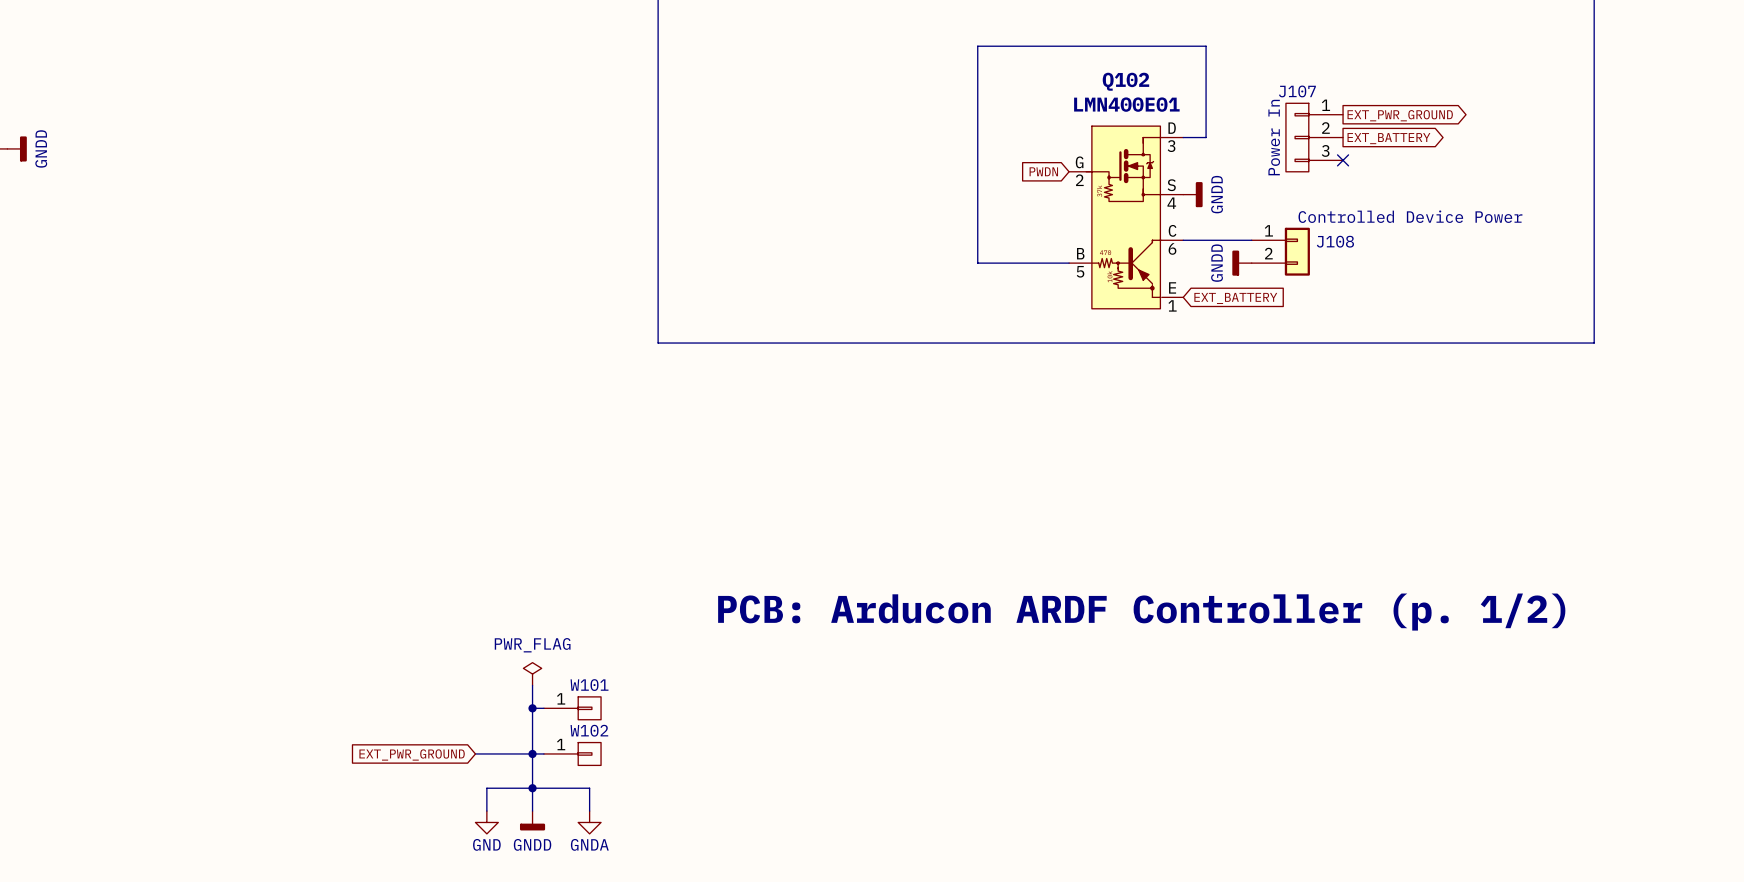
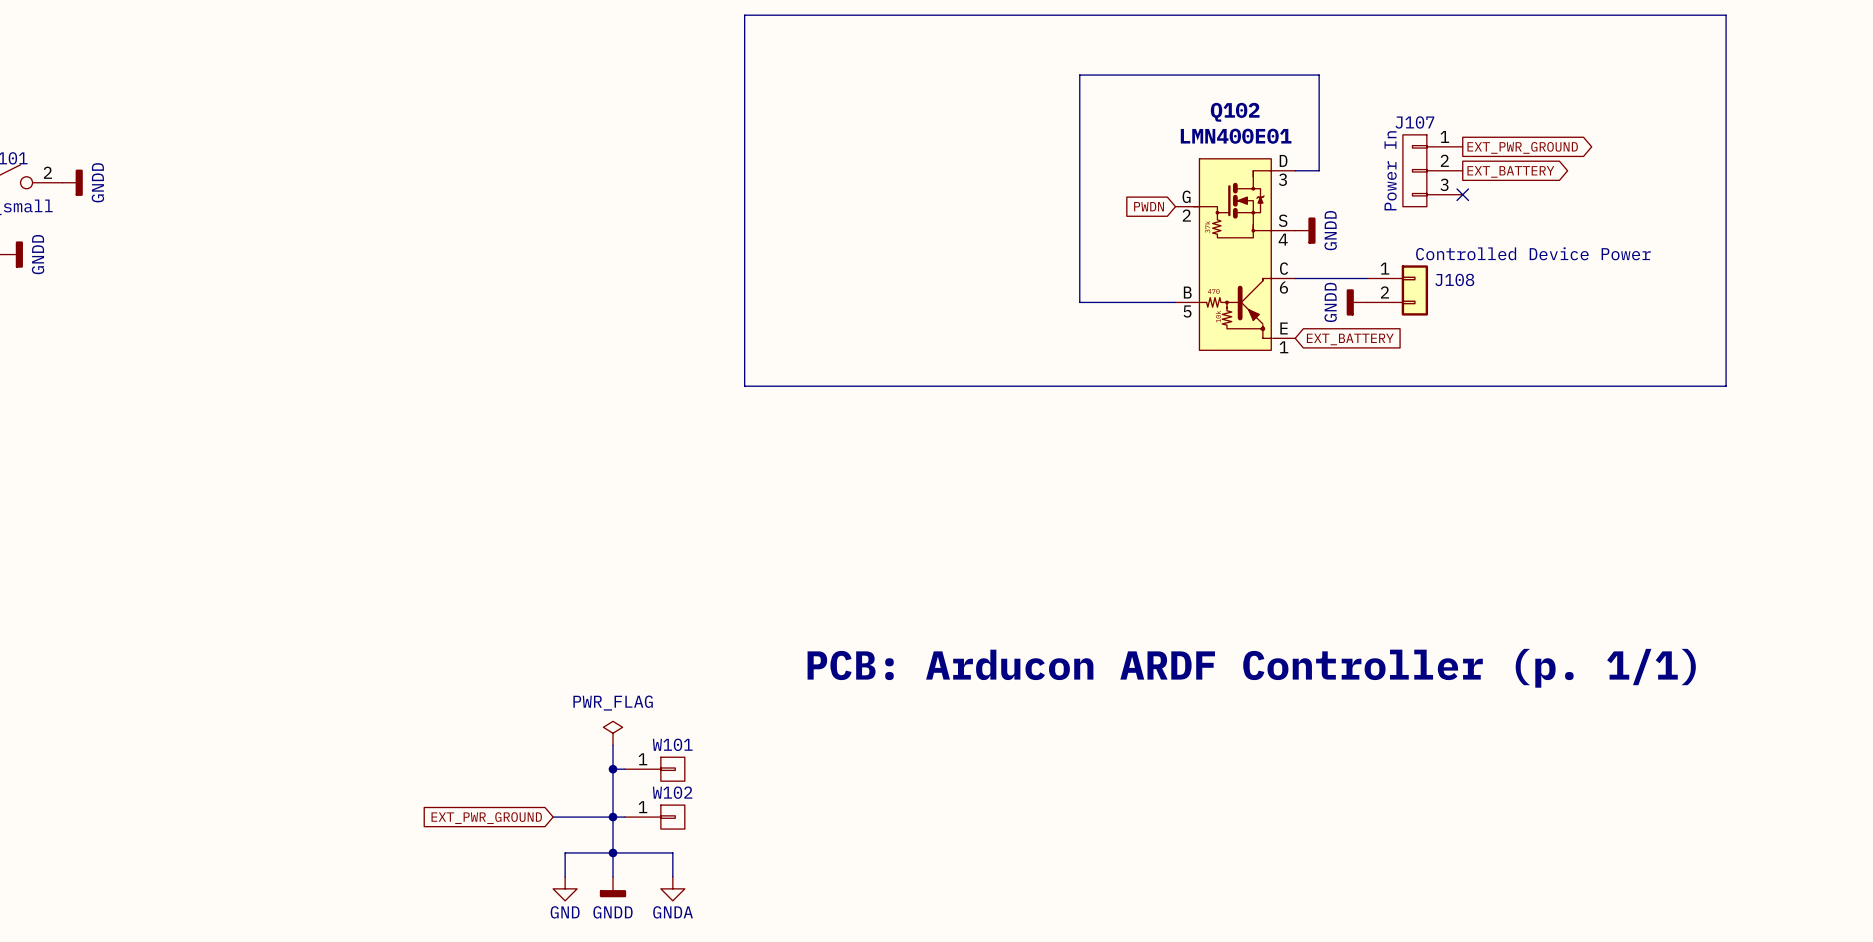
text: PCB: Arducon ARDF Controller (p. 1/2) (1141, 612) -> PCB: Arducon ARDF Controller (p. 1/1) (1251, 668)

